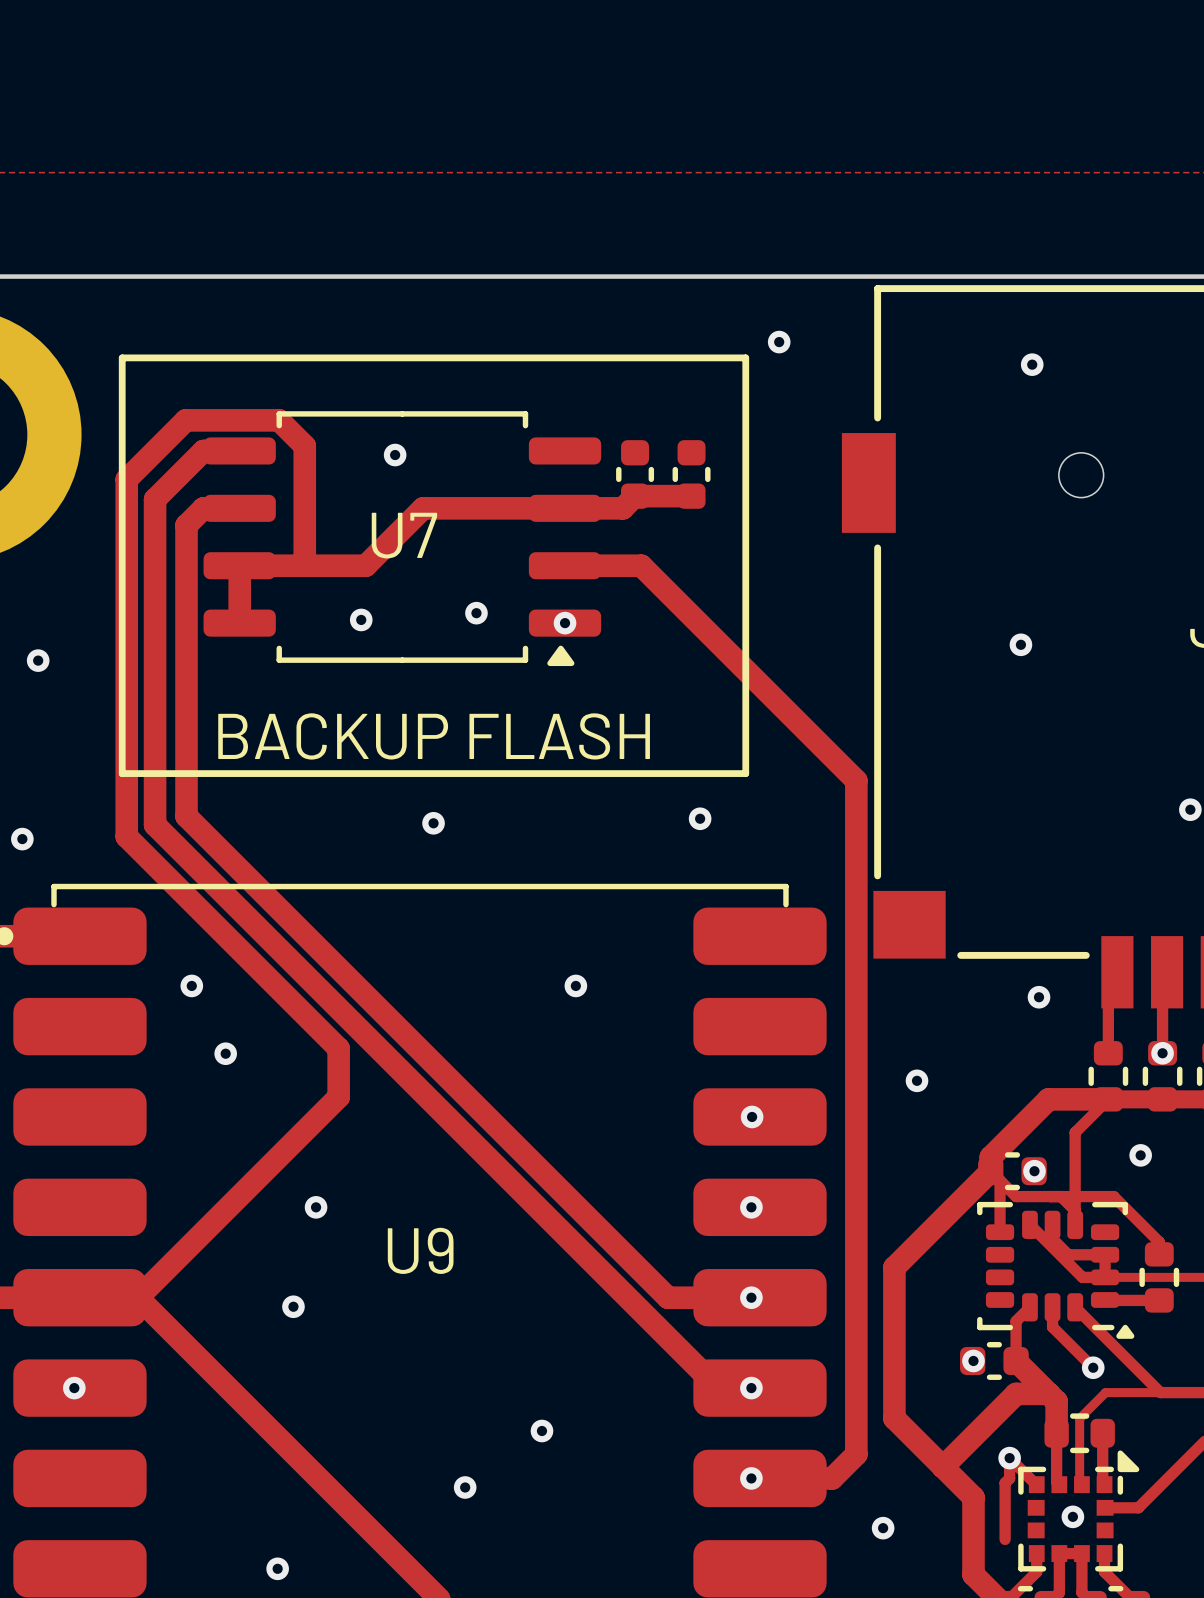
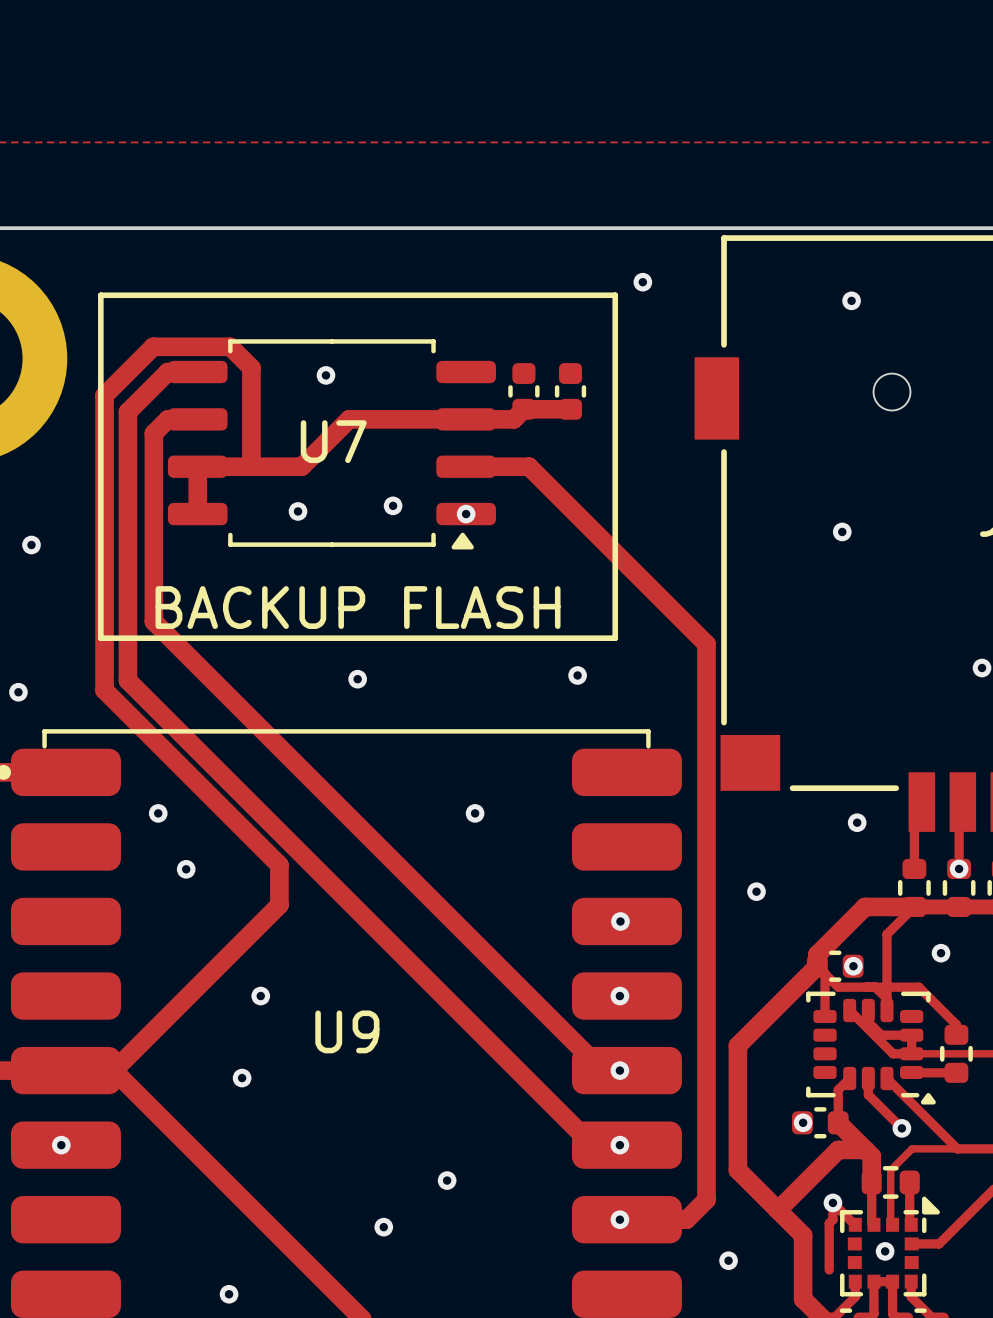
track: (186, 753) (186, 816) (667, 1297) (730, 1297) -> (153, 621) (602, 1070)

